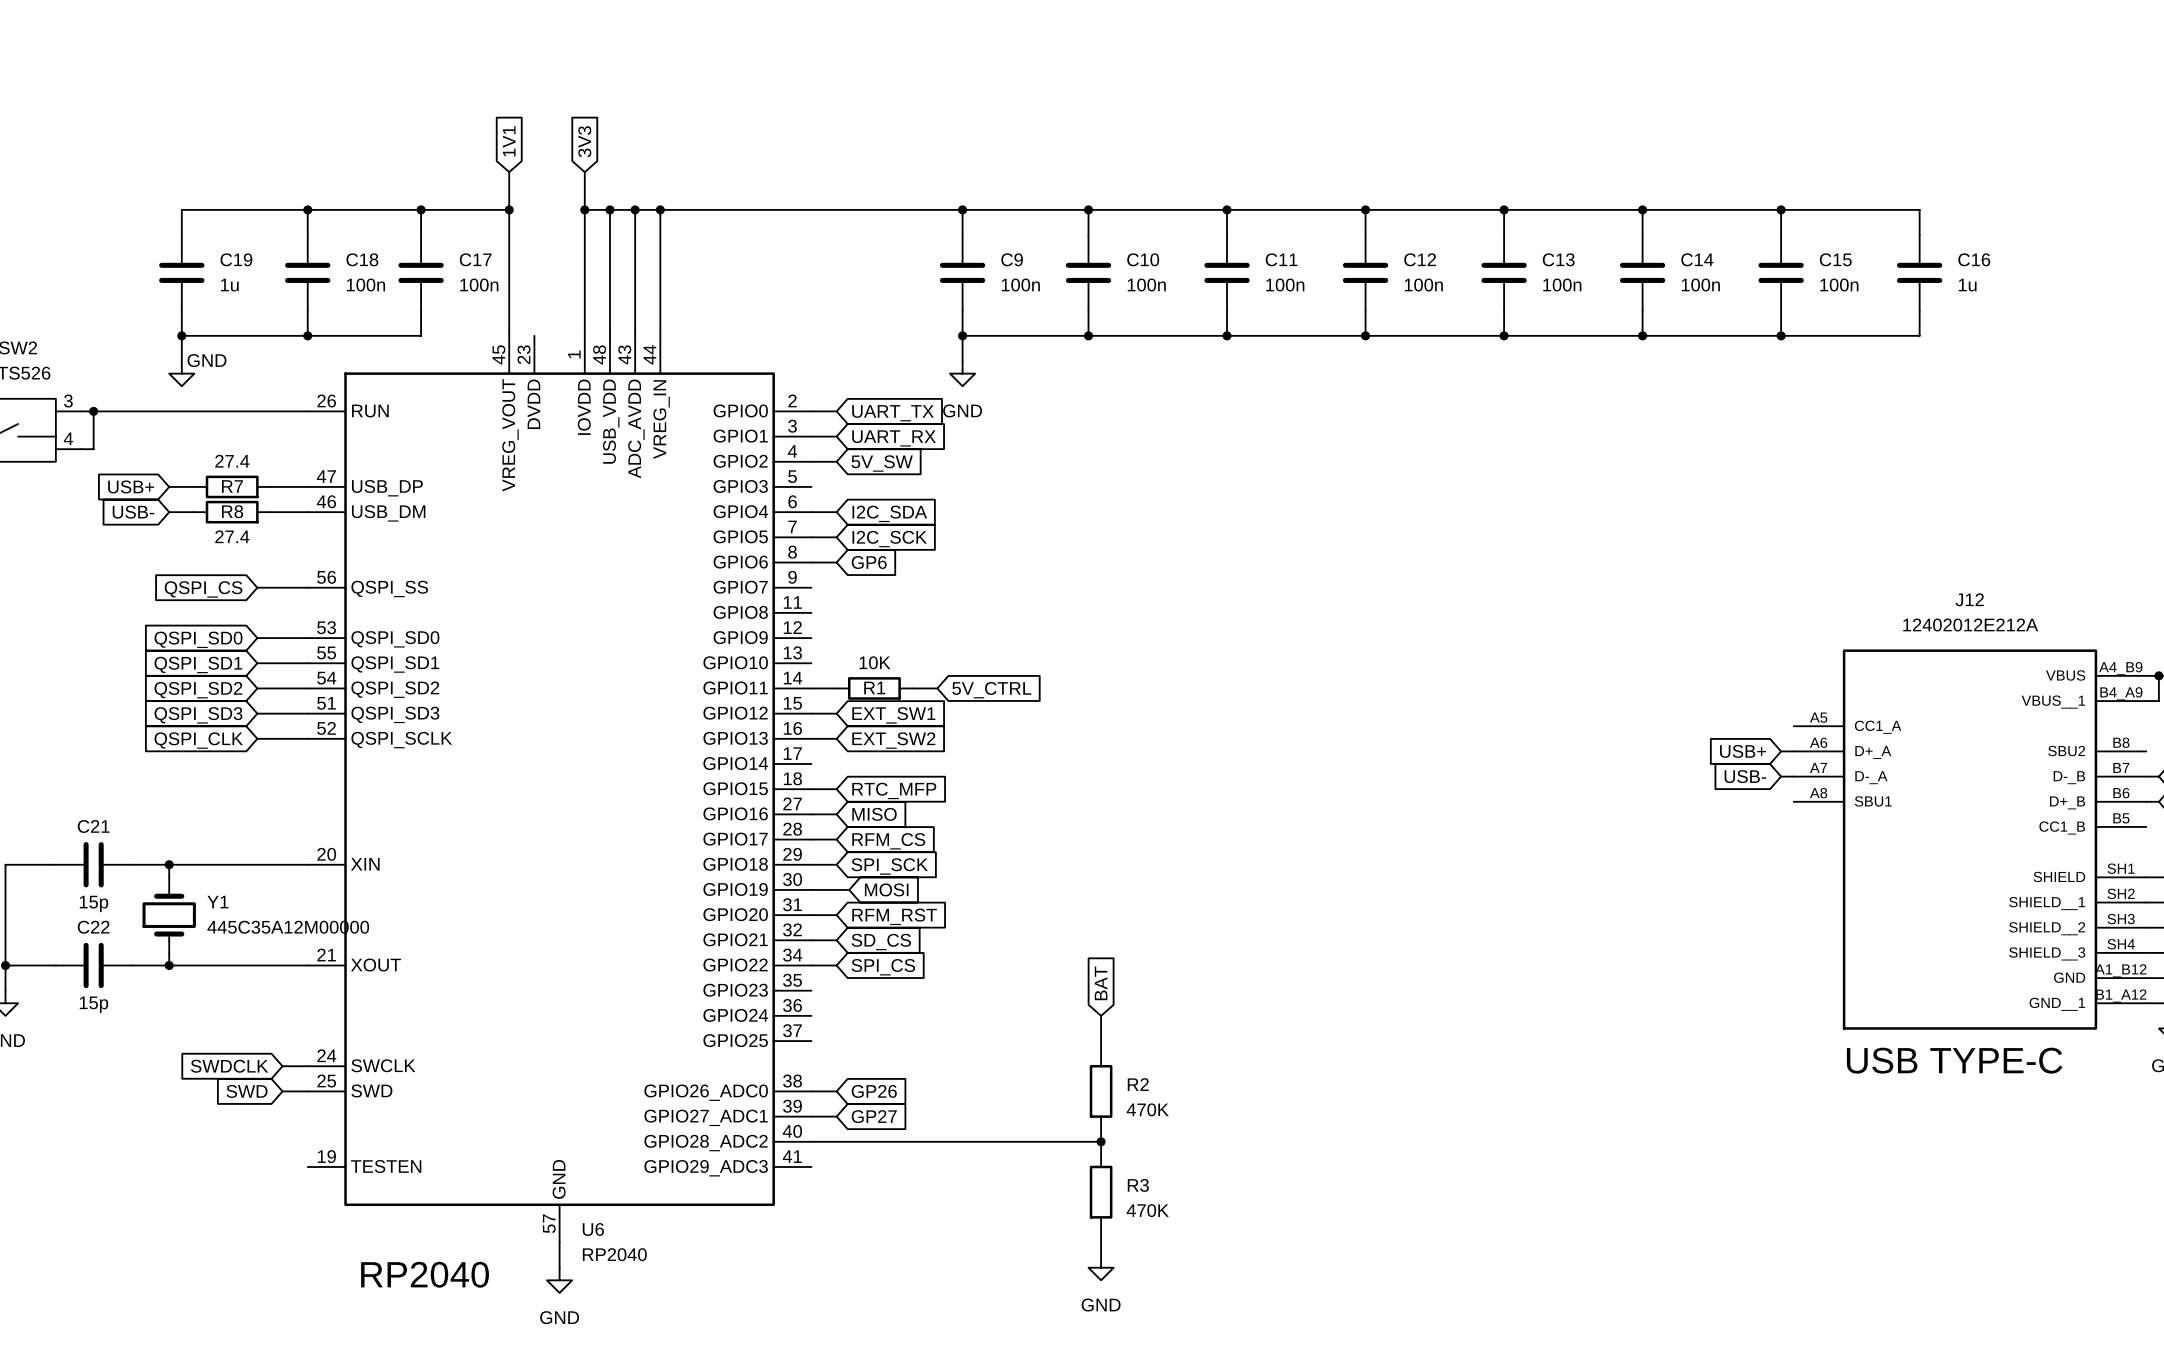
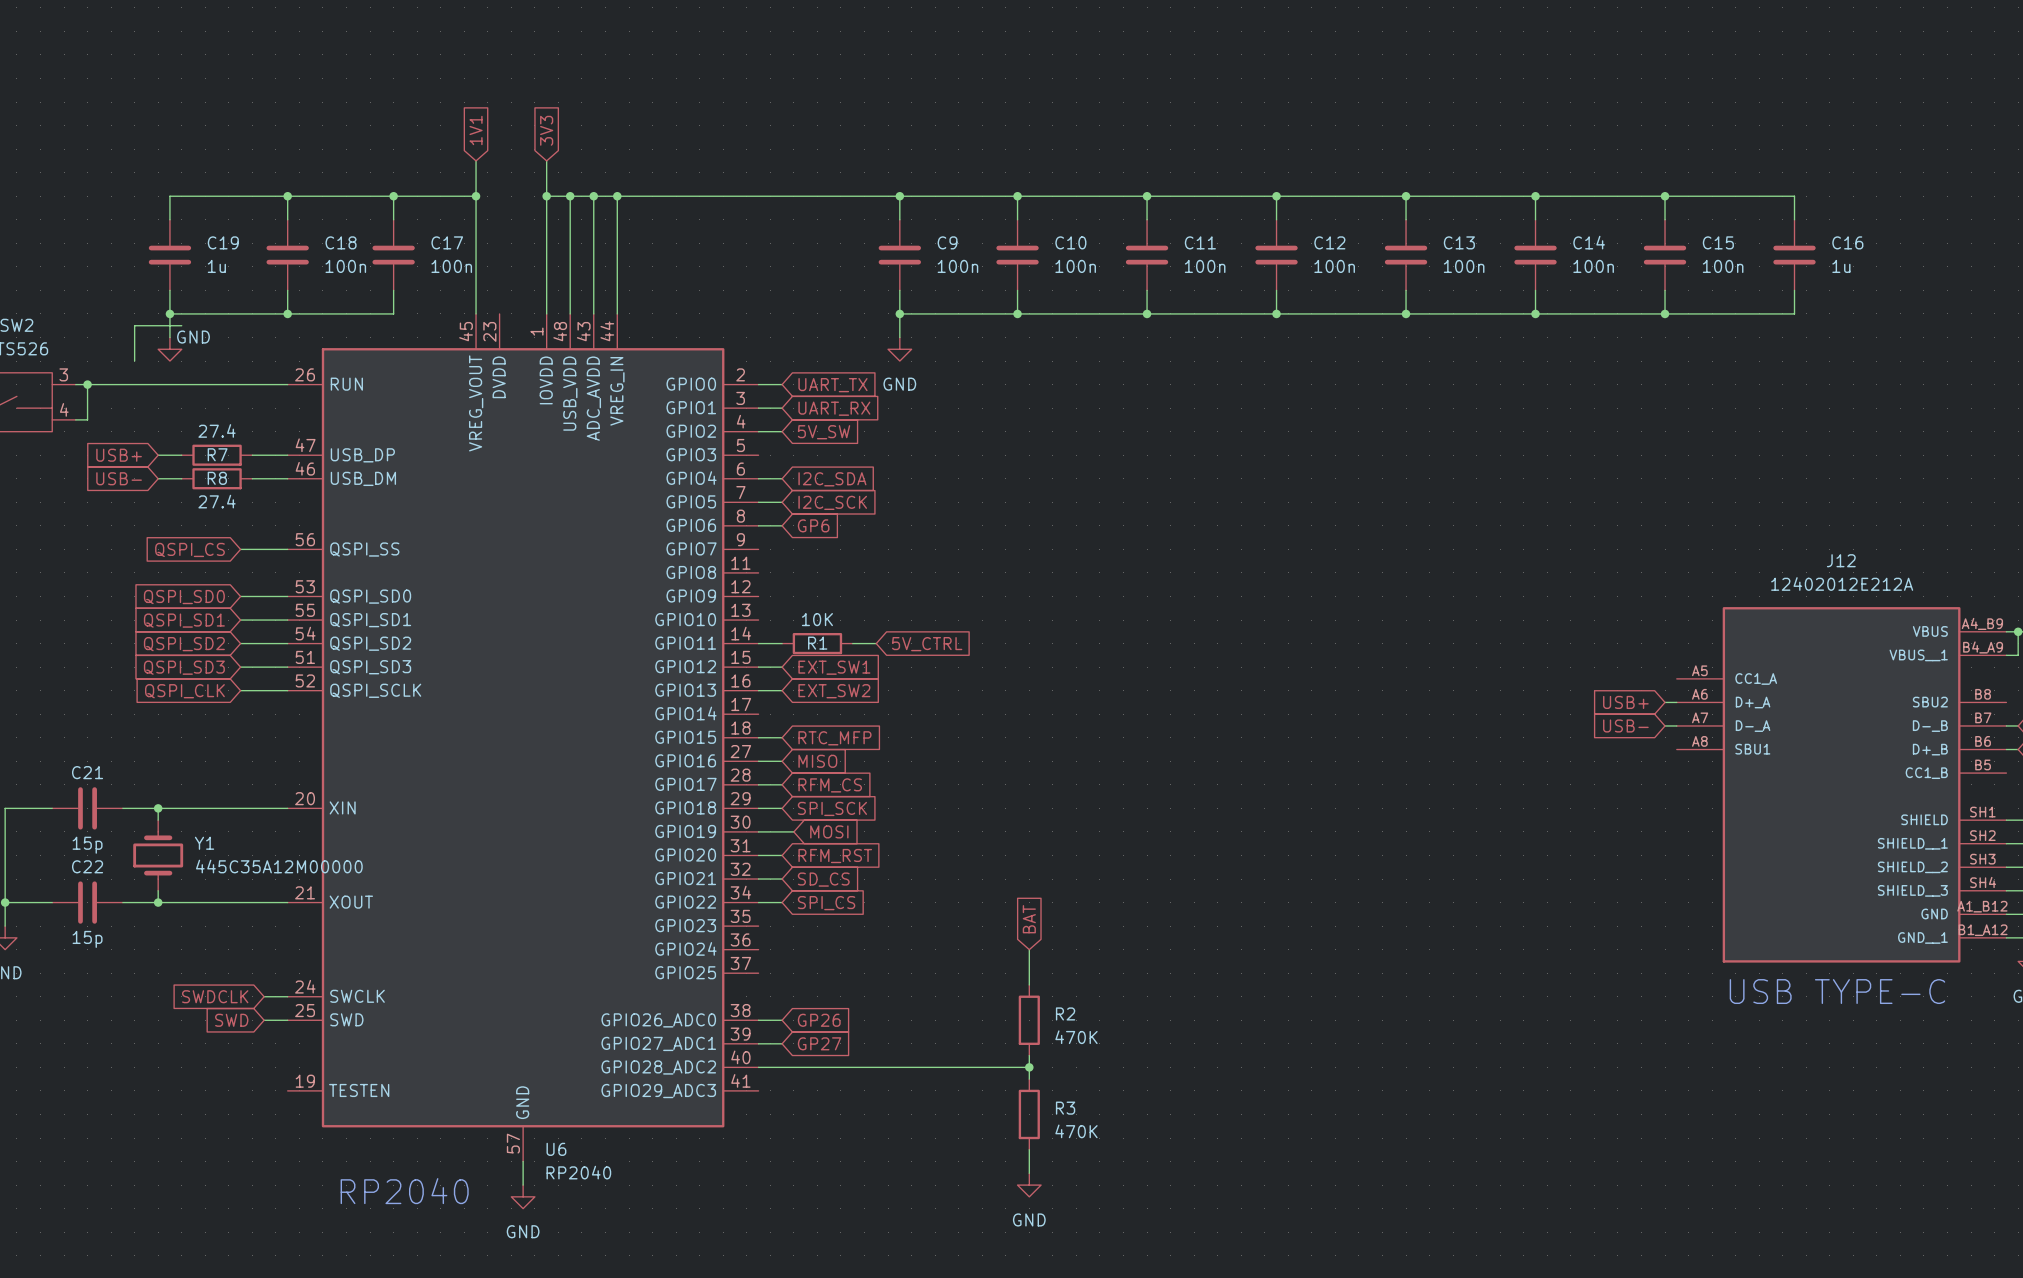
wire: none -> (181, 325) (134, 325) (134, 361)

